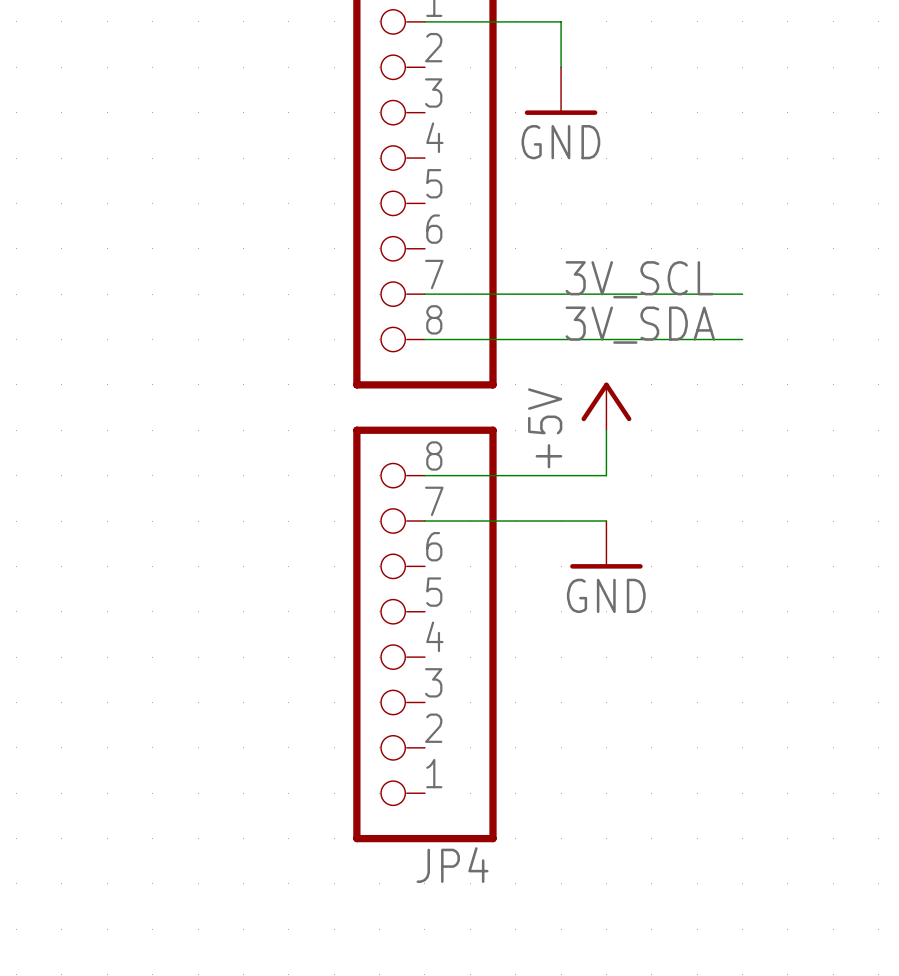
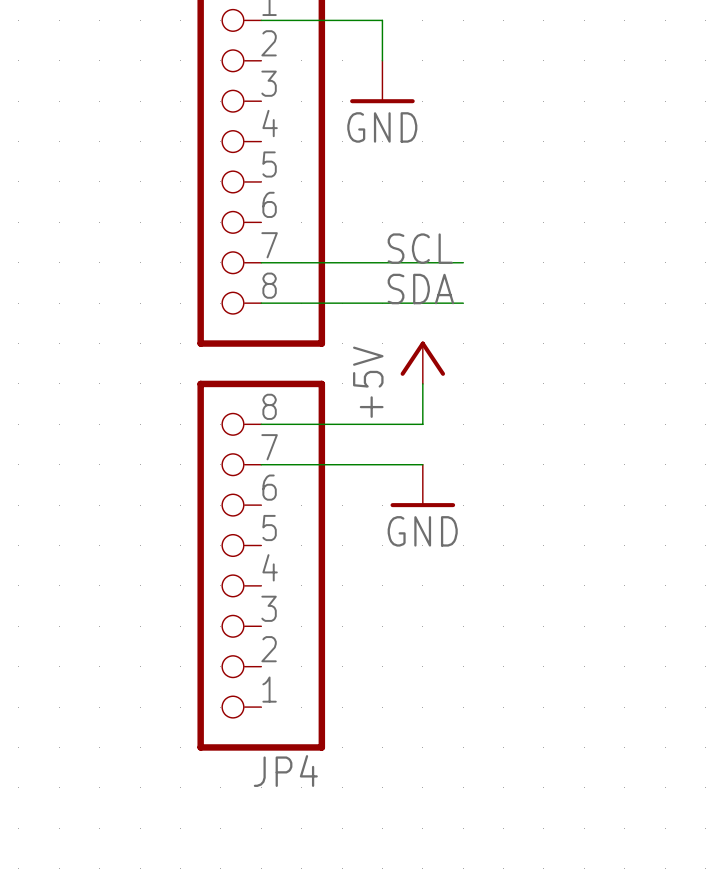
label: 3V_SCL (639, 279) -> SCL (420, 248)
wire: (651, 294) (742, 294) -> none
label: 3V_SDA (640, 325) -> SDA (420, 289)
wire: (651, 339) (742, 339) -> none

